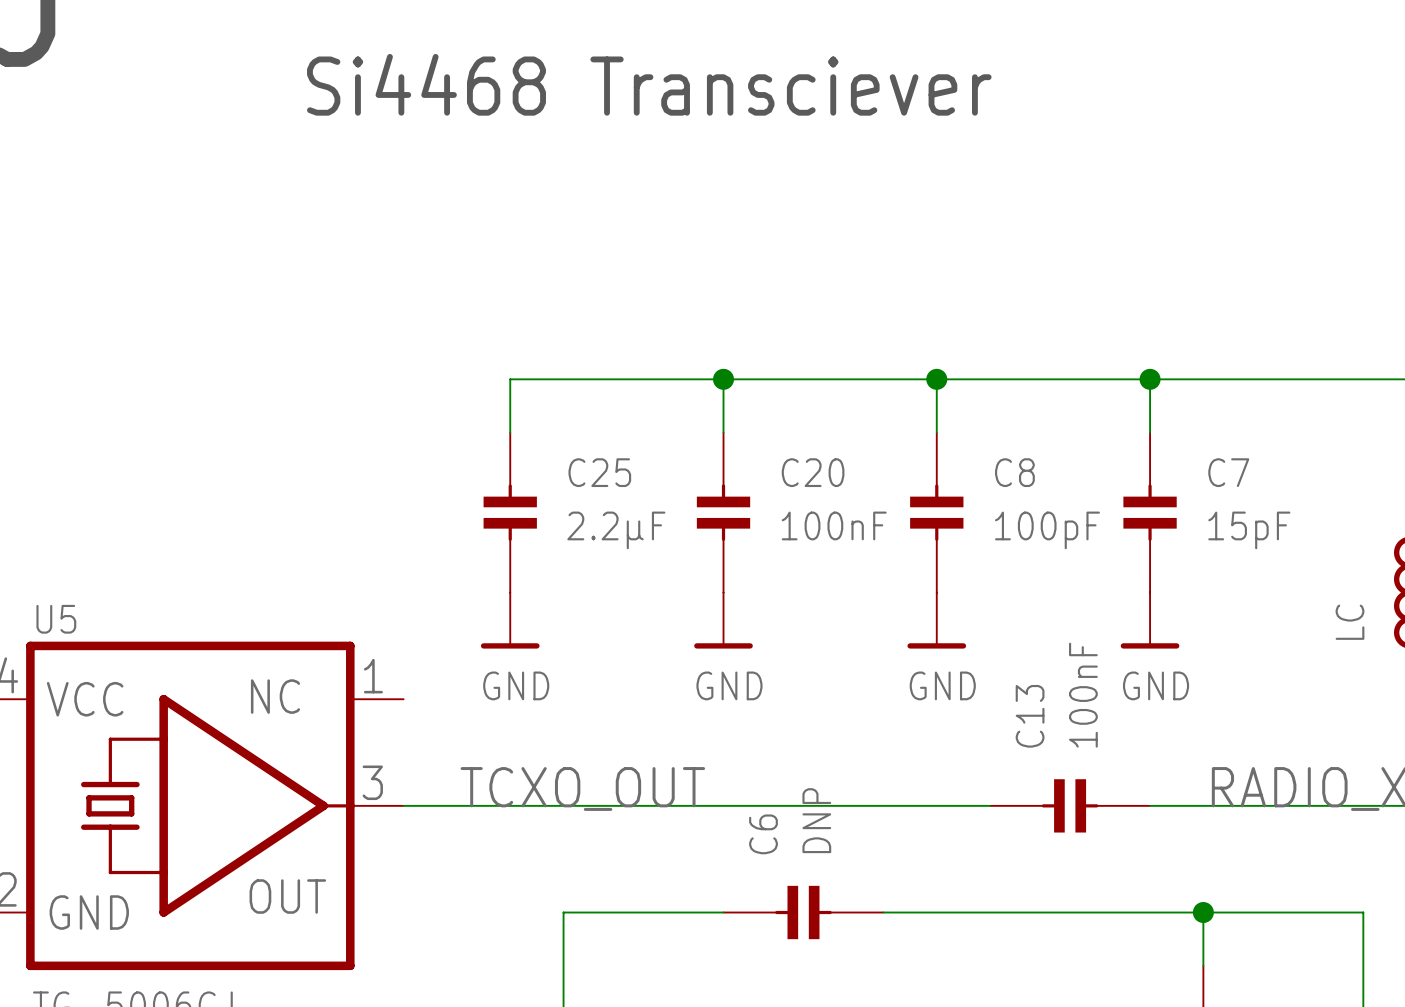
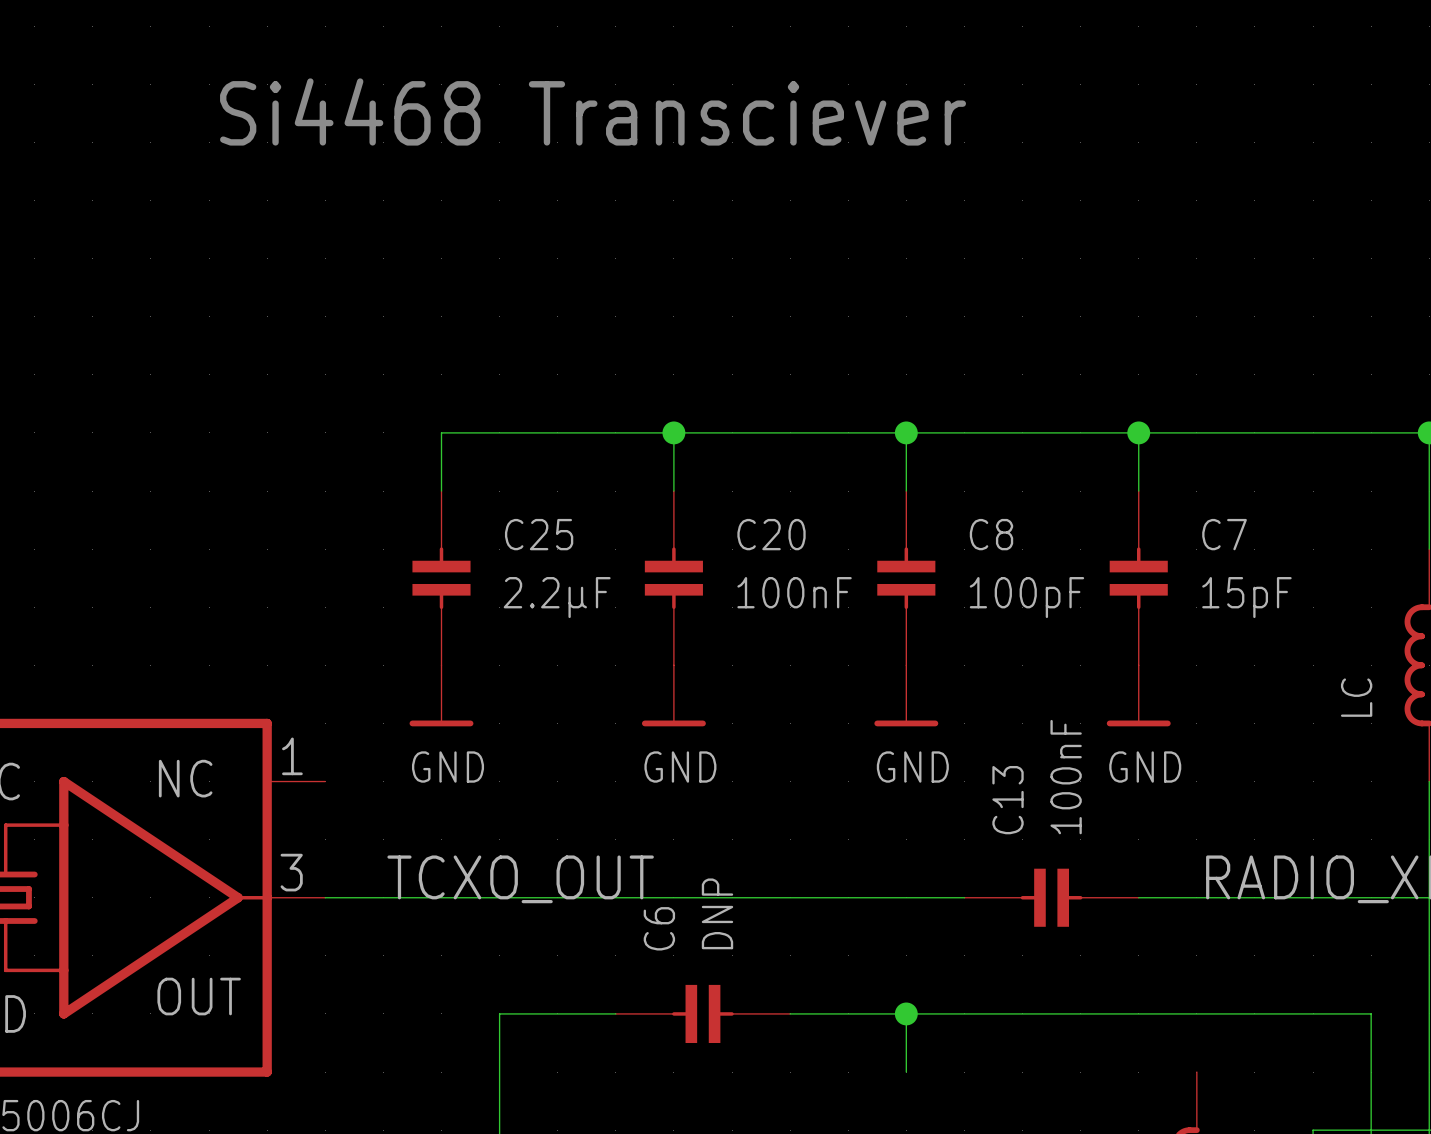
C6 position: (803, 912) -> (702, 1013)
junction: none -> (906, 1013)
wire: (1203, 912) (1203, 965) -> (906, 1013) (906, 1072)
junction: (1203, 912) -> none

